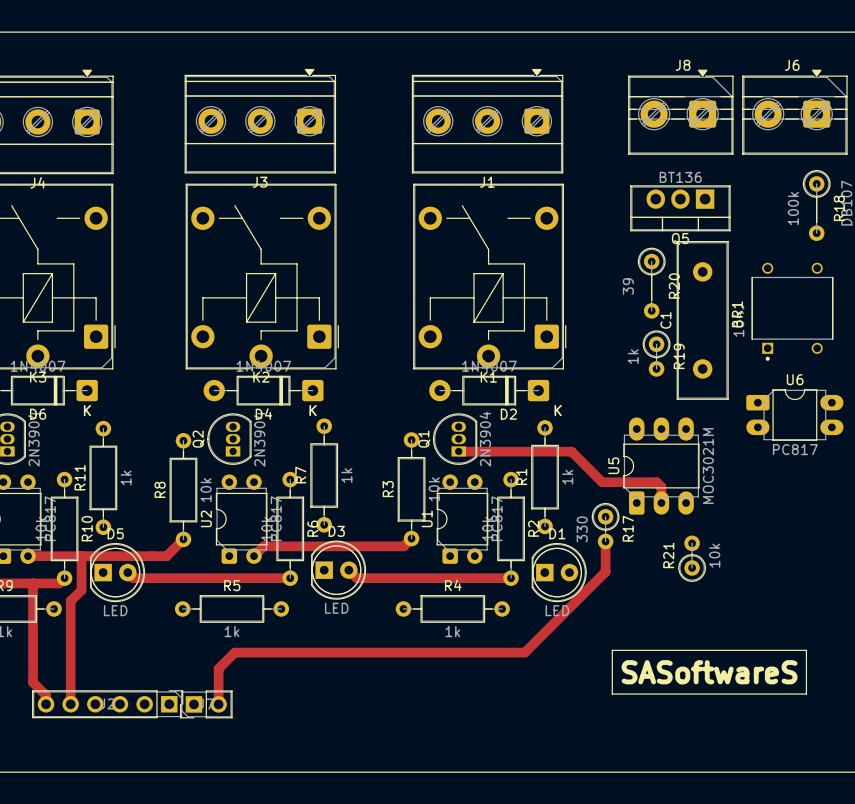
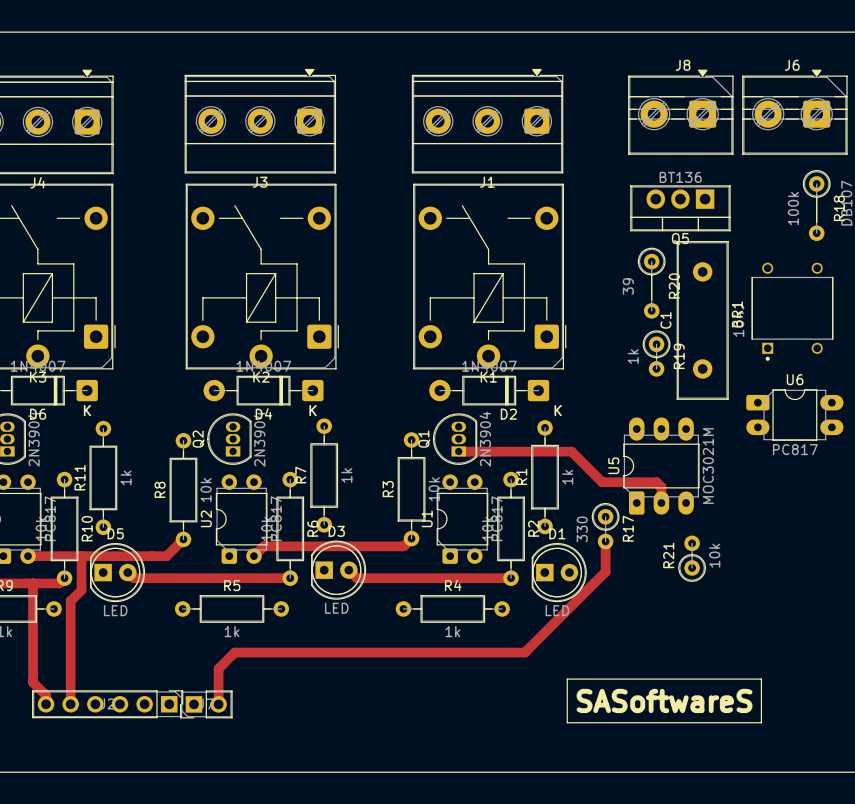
line: (612, 650) (806, 650) (806, 694) (612, 694) (612, 650) -> (567, 679) (761, 679) (761, 722) (567, 722) (567, 679)
text position: SASoftwareS (709, 672) -> SASoftwareS (664, 700)

